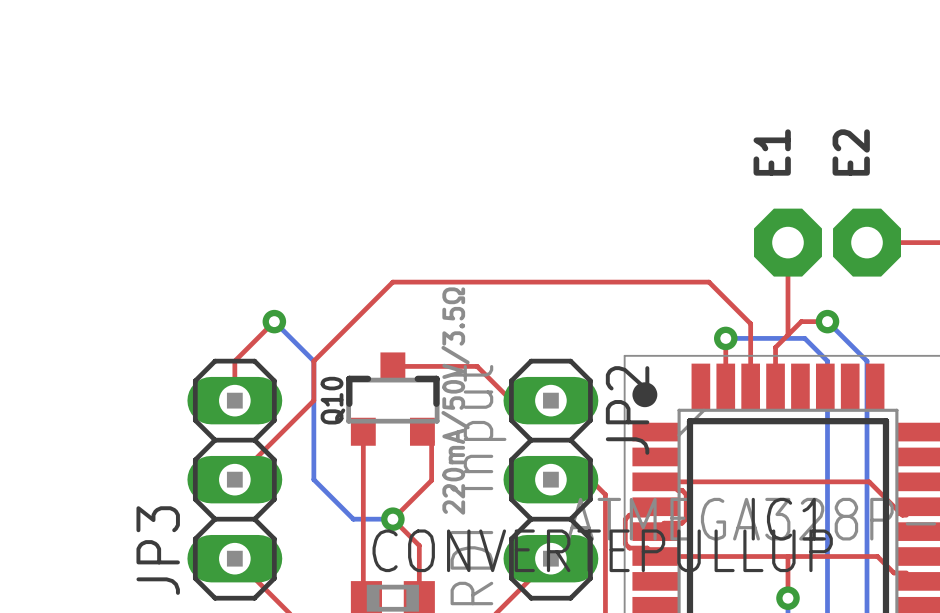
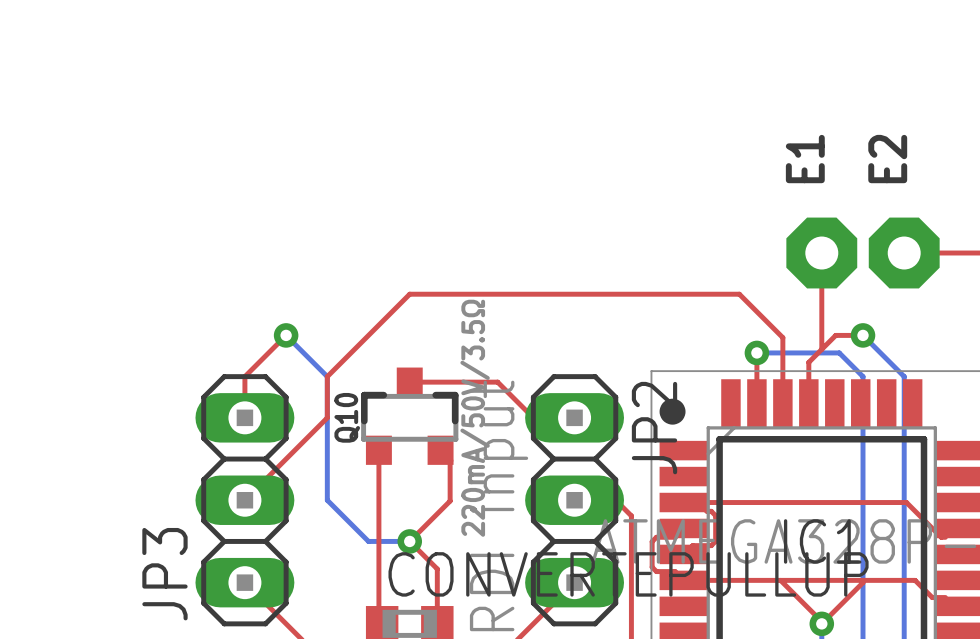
top track: (787, 556) (787, 596) -> (780, 580) (821, 621)
top track: none -> (863, 580) (863, 582) (821, 623)

